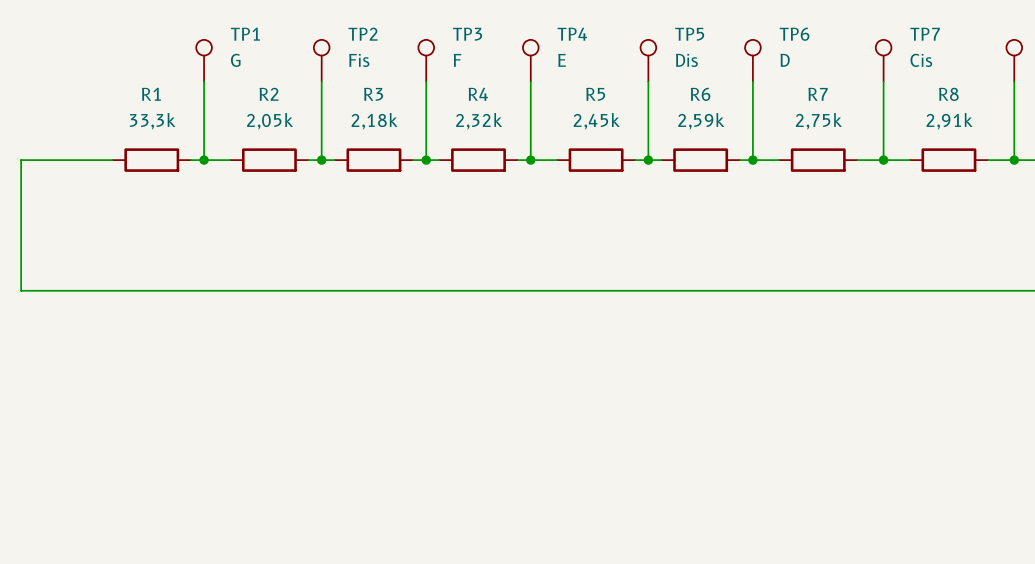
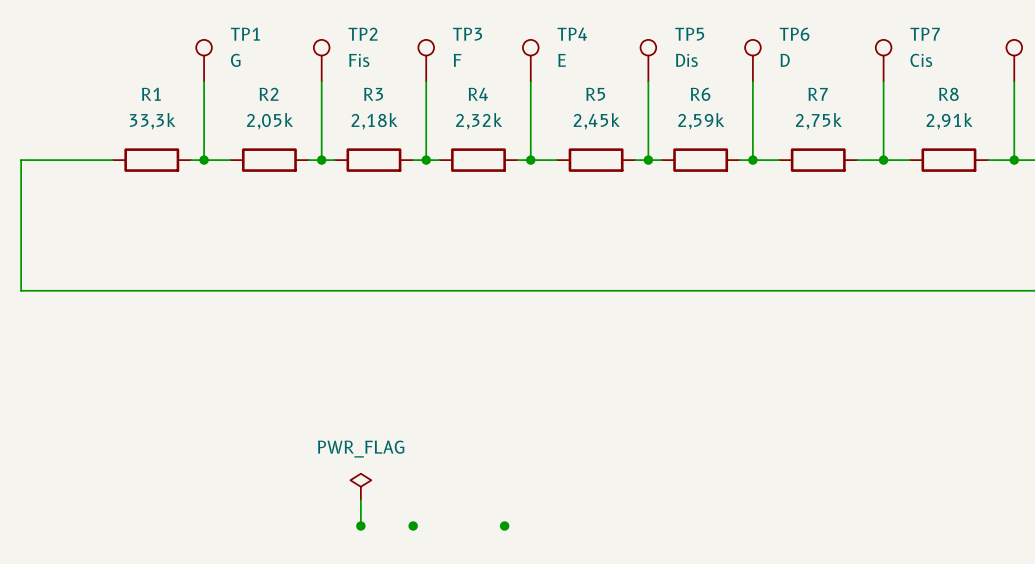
power symbol: none -> PWR_FLAG (360, 486)
wire: none -> (360, 499) (360, 525)
junction: none -> (360, 525)
junction: none -> (413, 525)
junction: none -> (504, 525)

